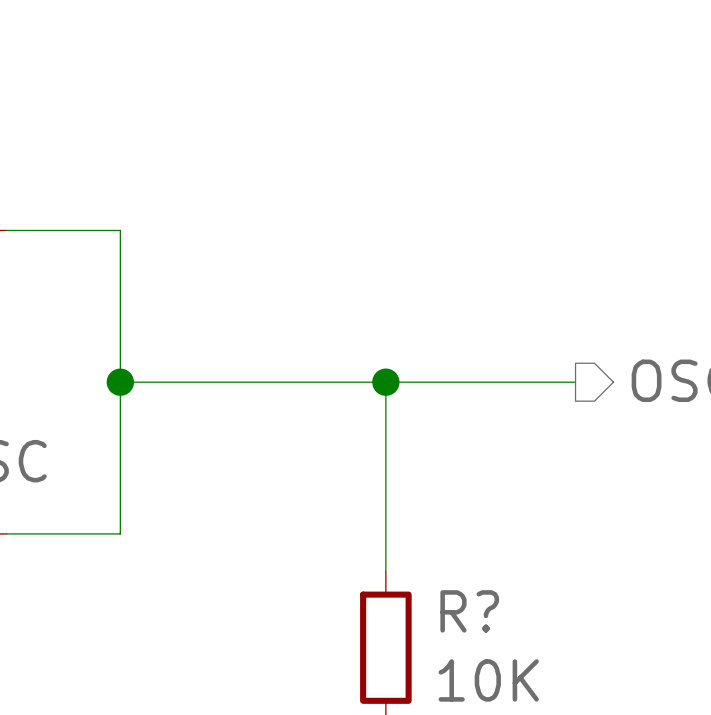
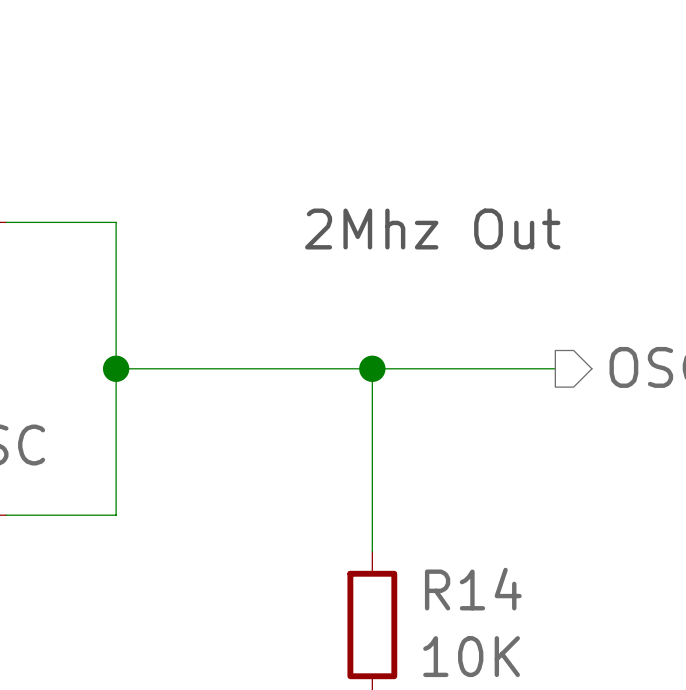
text: none -> 2Mhz Out (432, 229)
R? name: R? (469, 611) -> R14 (473, 589)

